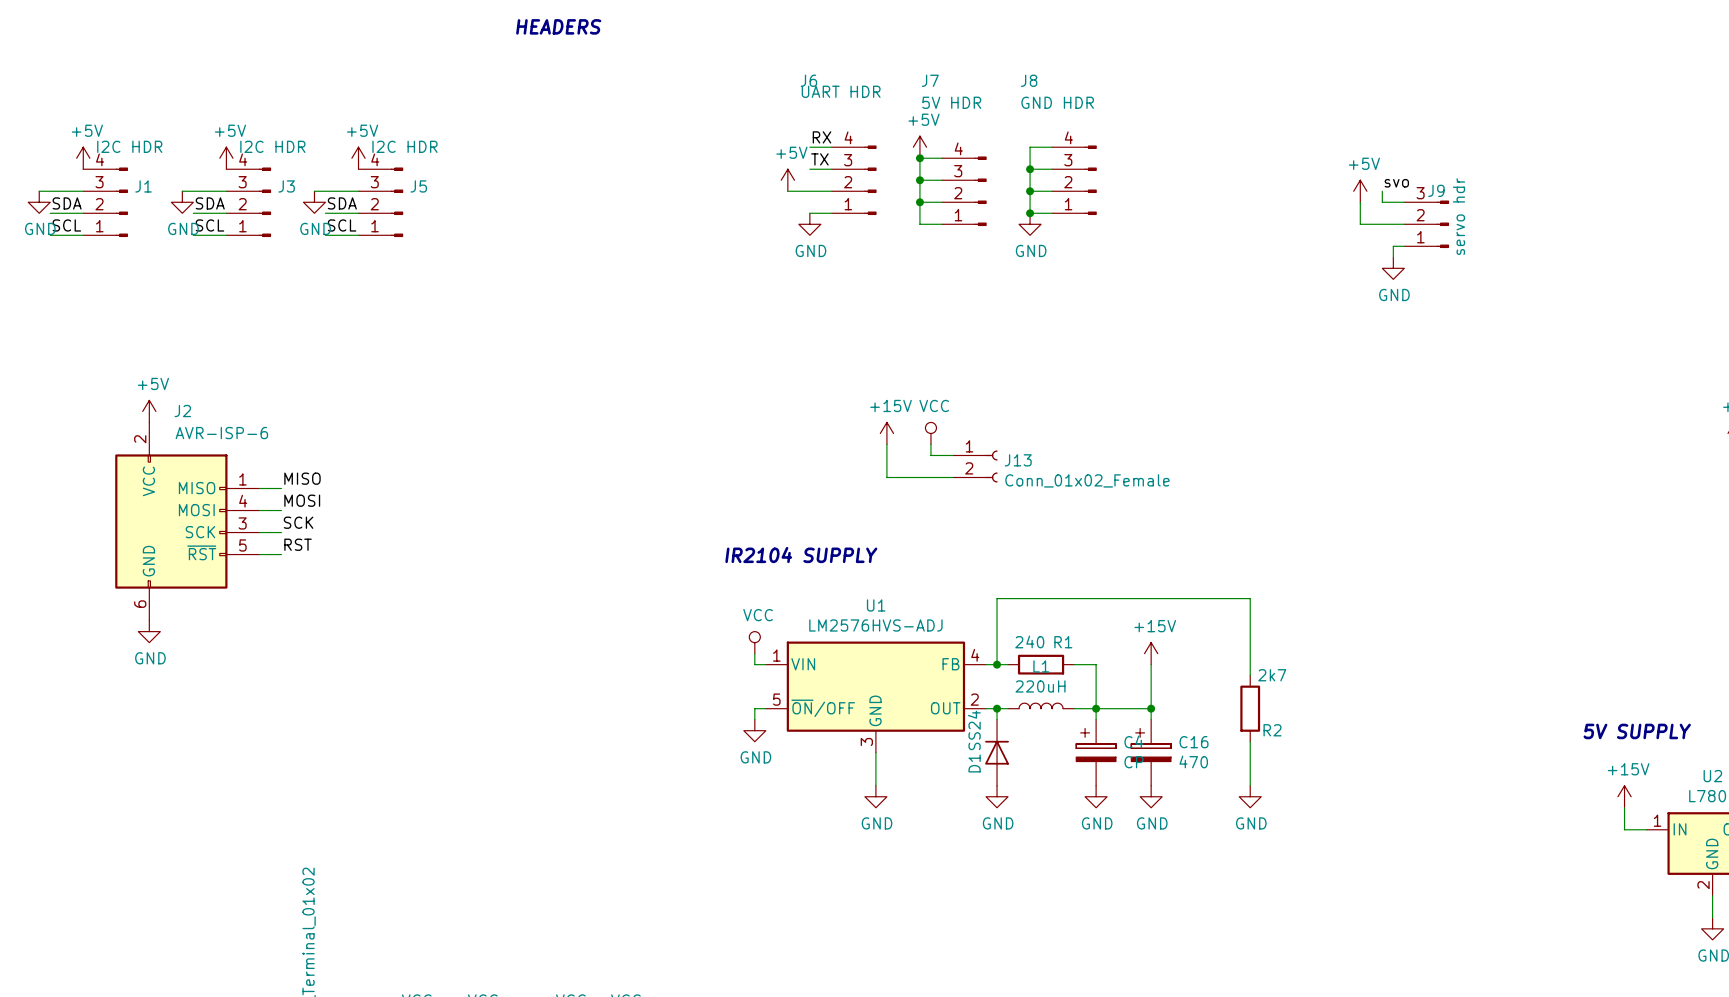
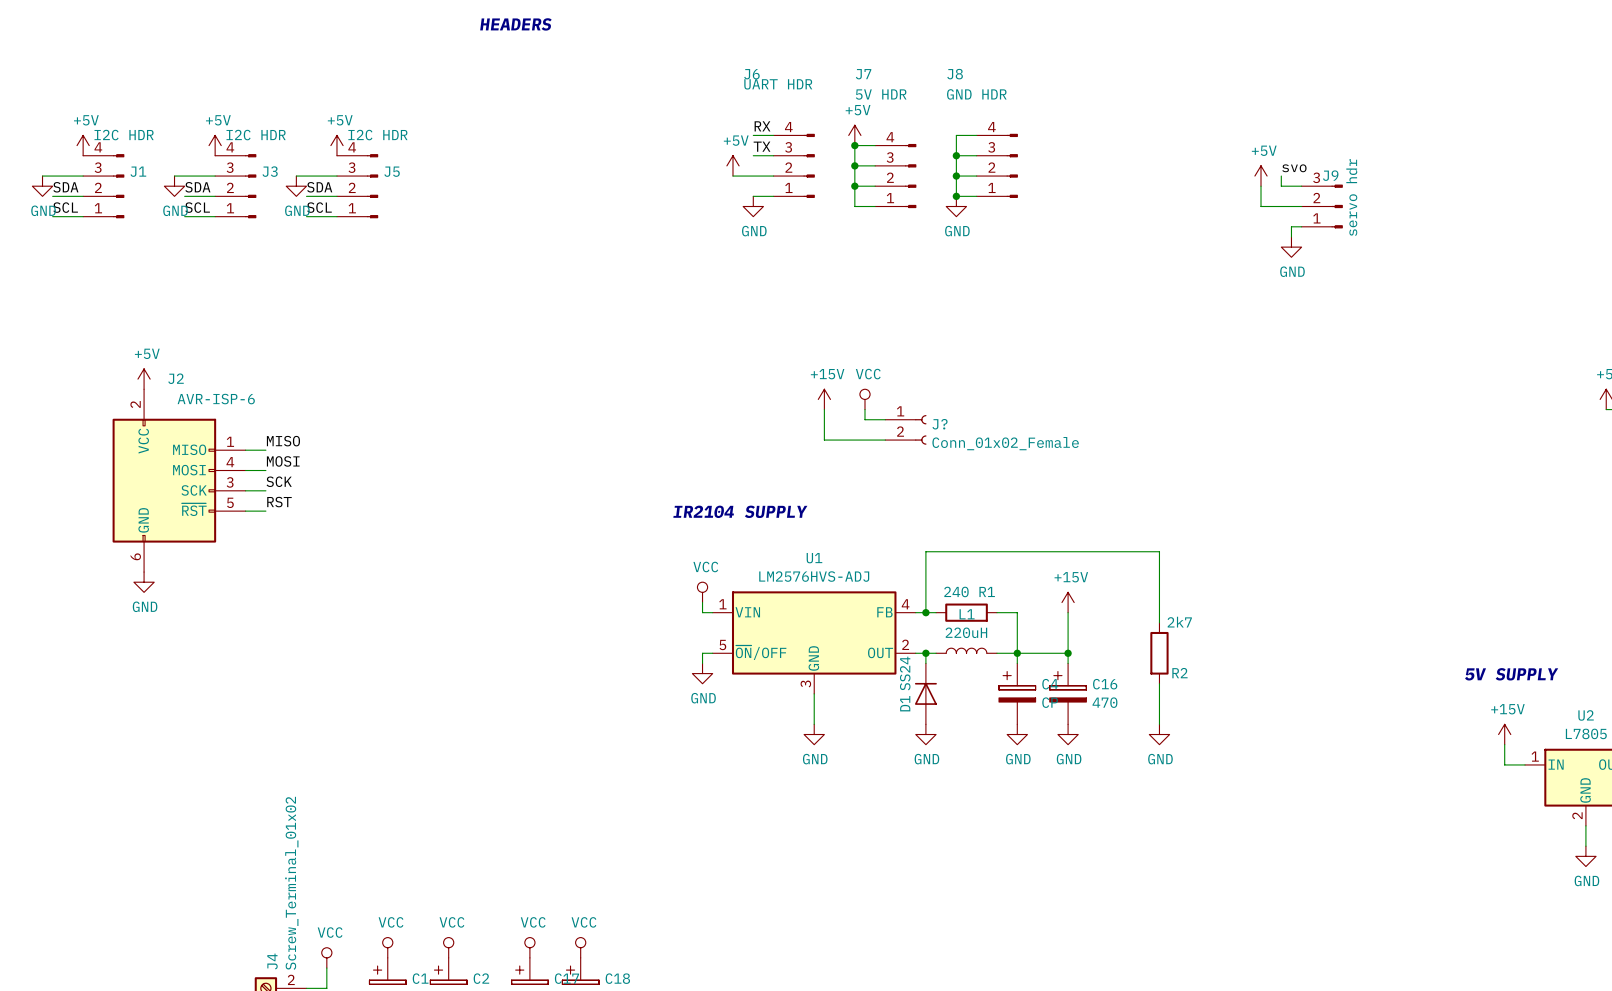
J13 name: J13 (1018, 460) -> J? (940, 424)

